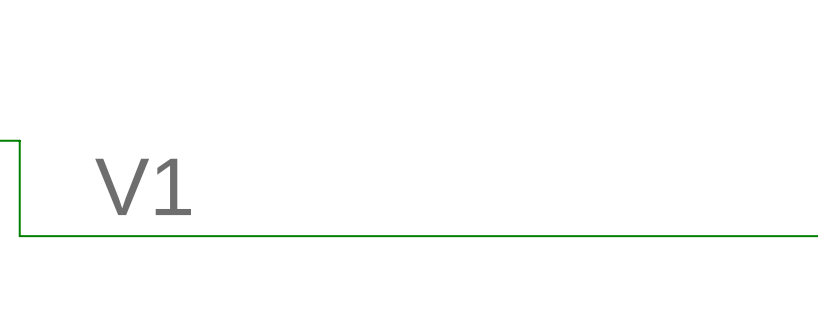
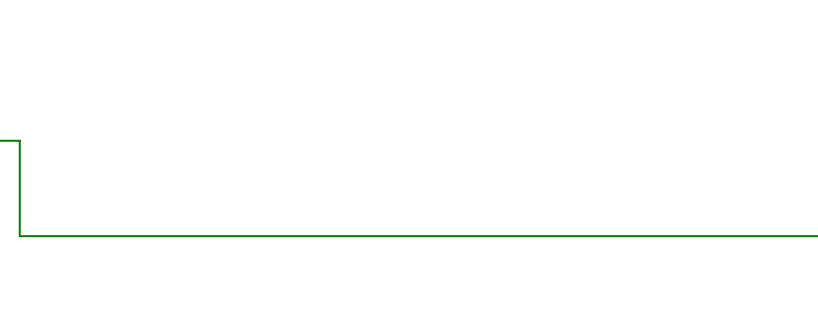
label: V1 (143, 186) -> none

